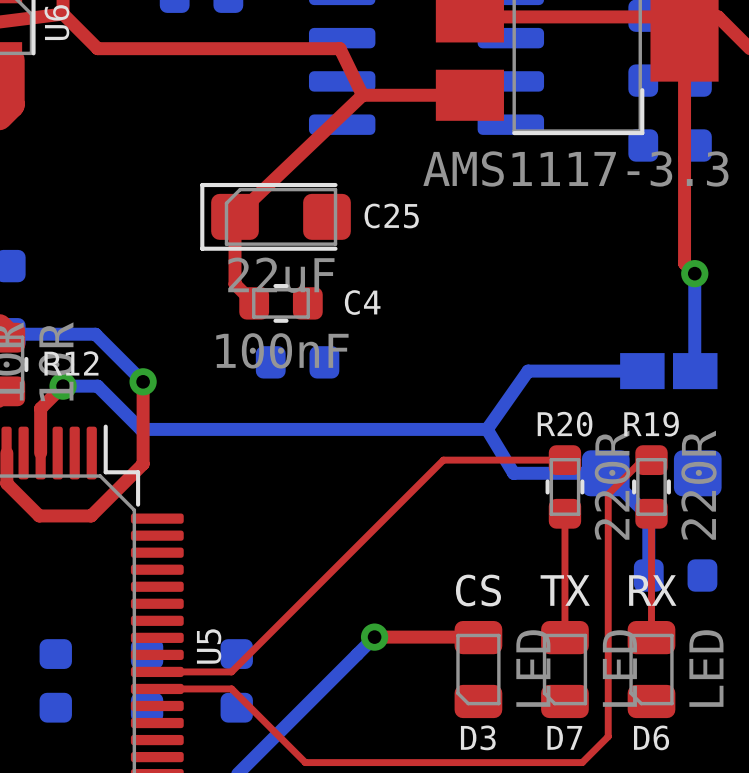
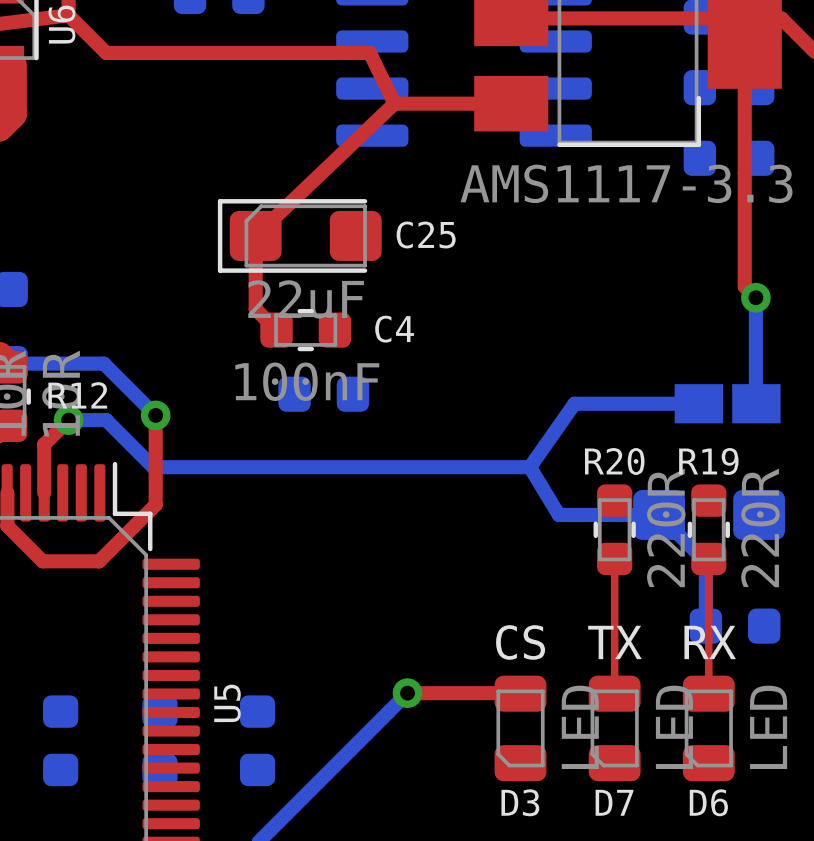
top track: (564, 460) (443, 460) (231, 671) (157, 671) -> none
top track: (651, 460) (642, 460) (608, 494) (608, 736) (582, 762) (305, 762) (231, 688) (157, 688) -> none

